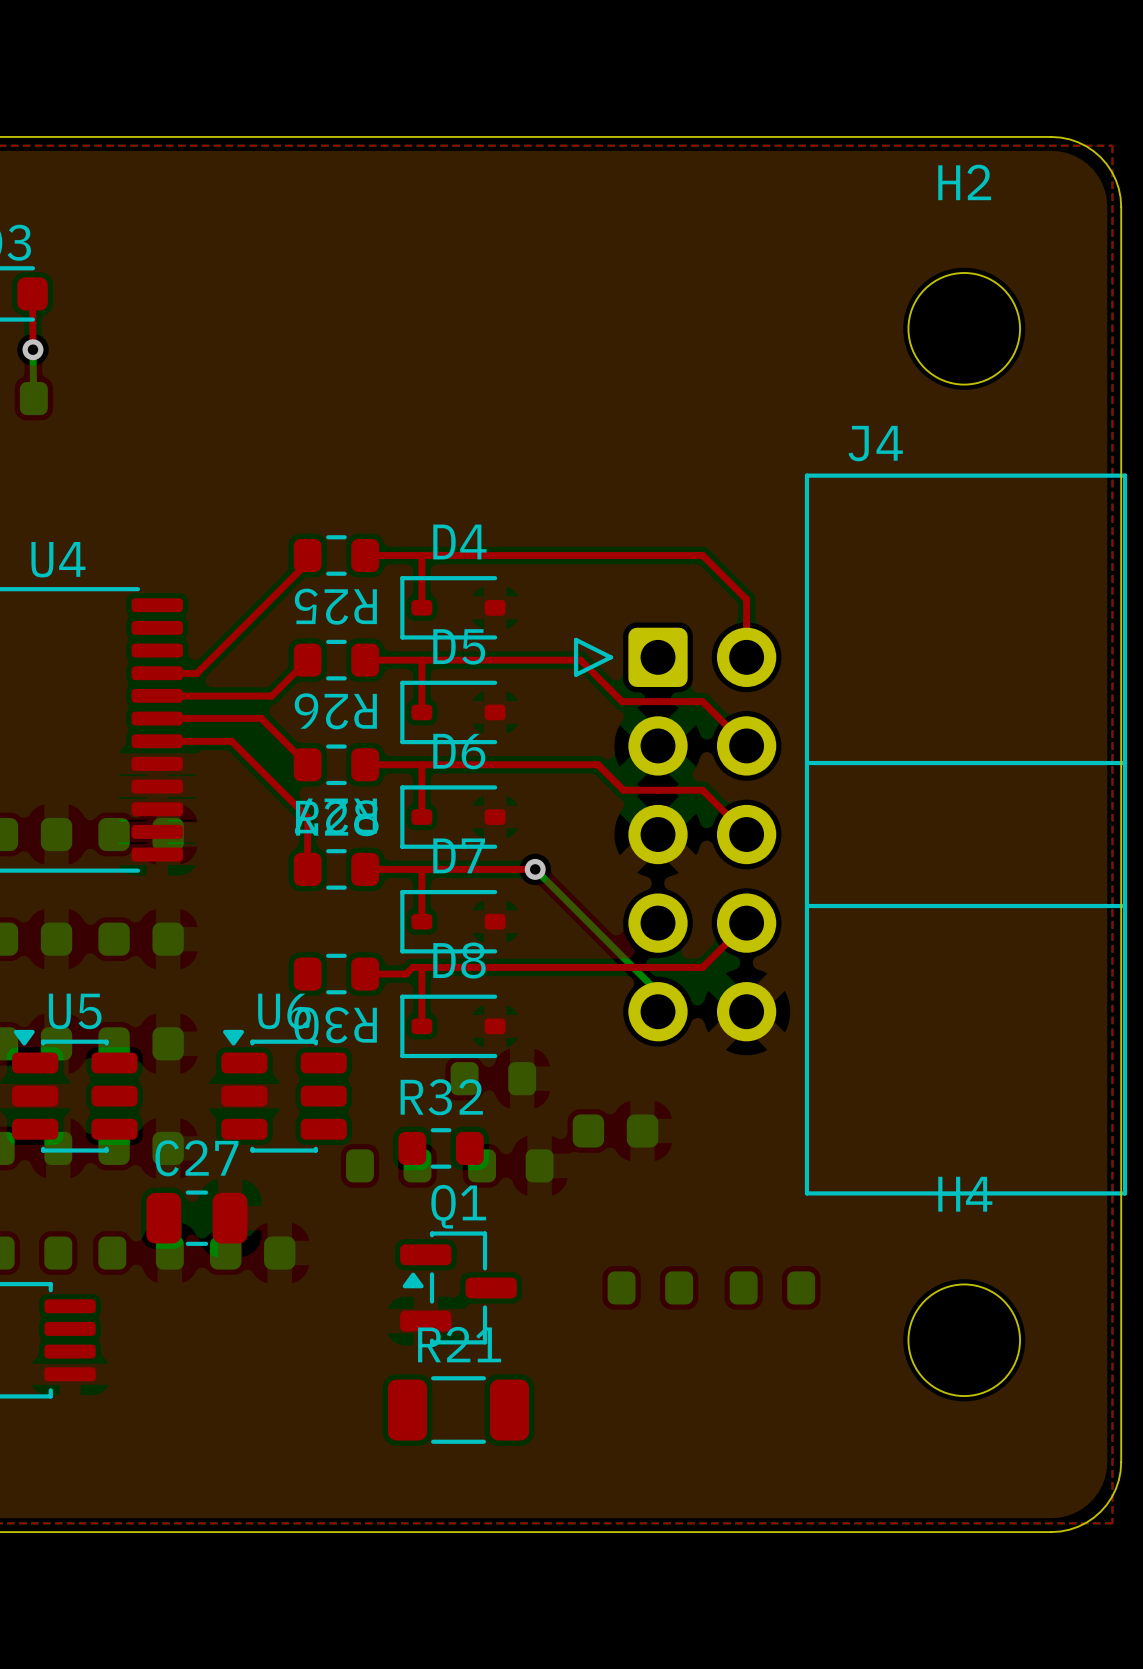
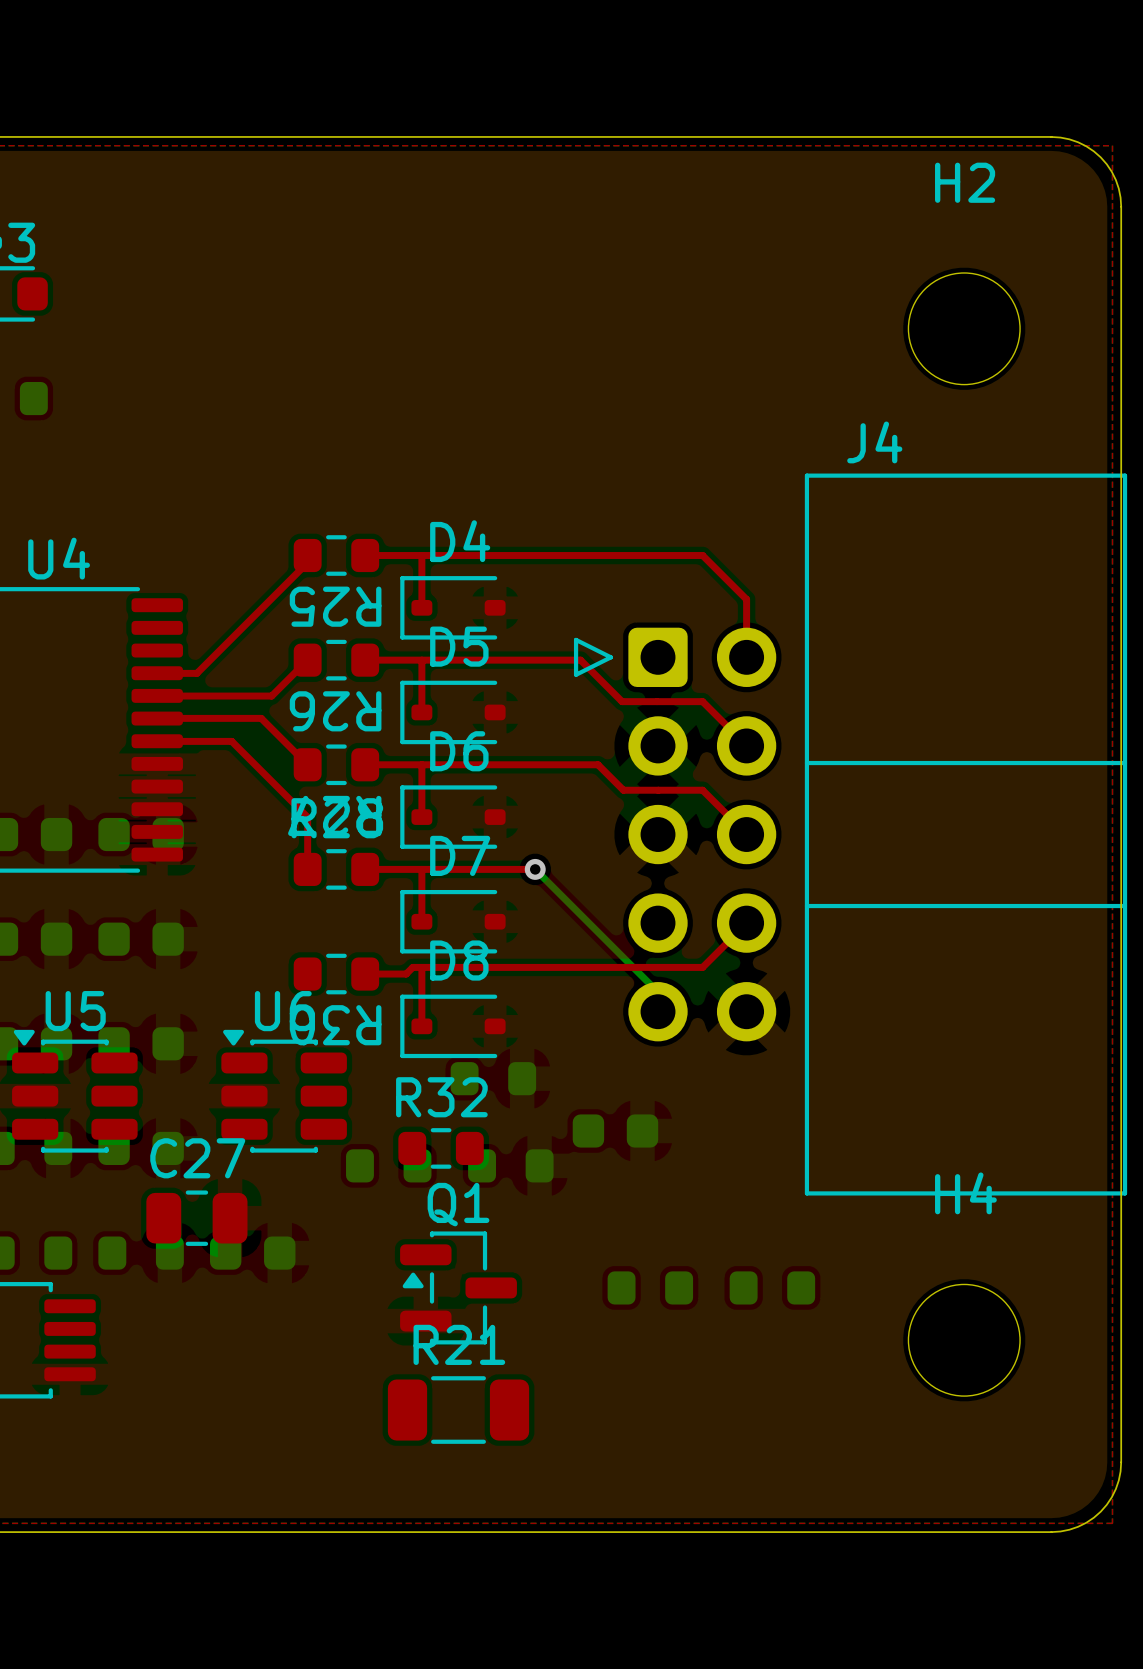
top track: (32, 293) (32, 349) -> none
bottom track: (32, 349) (33, 398) -> none
via: (32, 349) -> none

